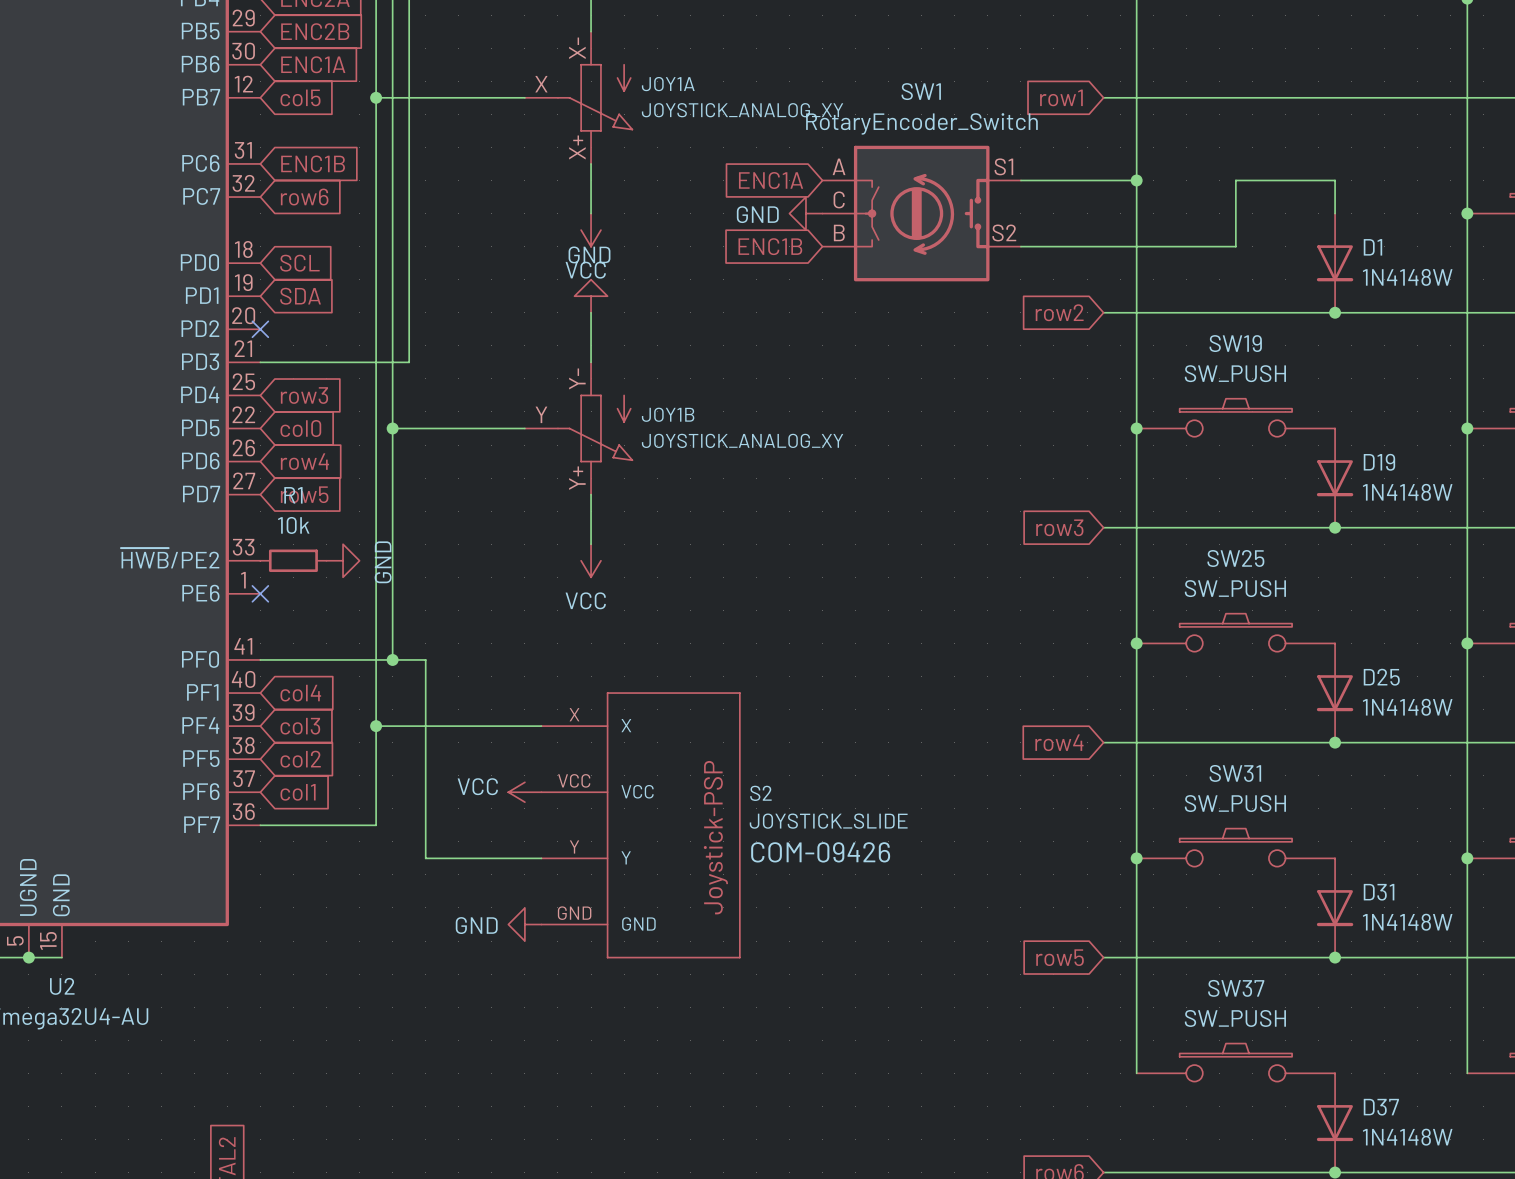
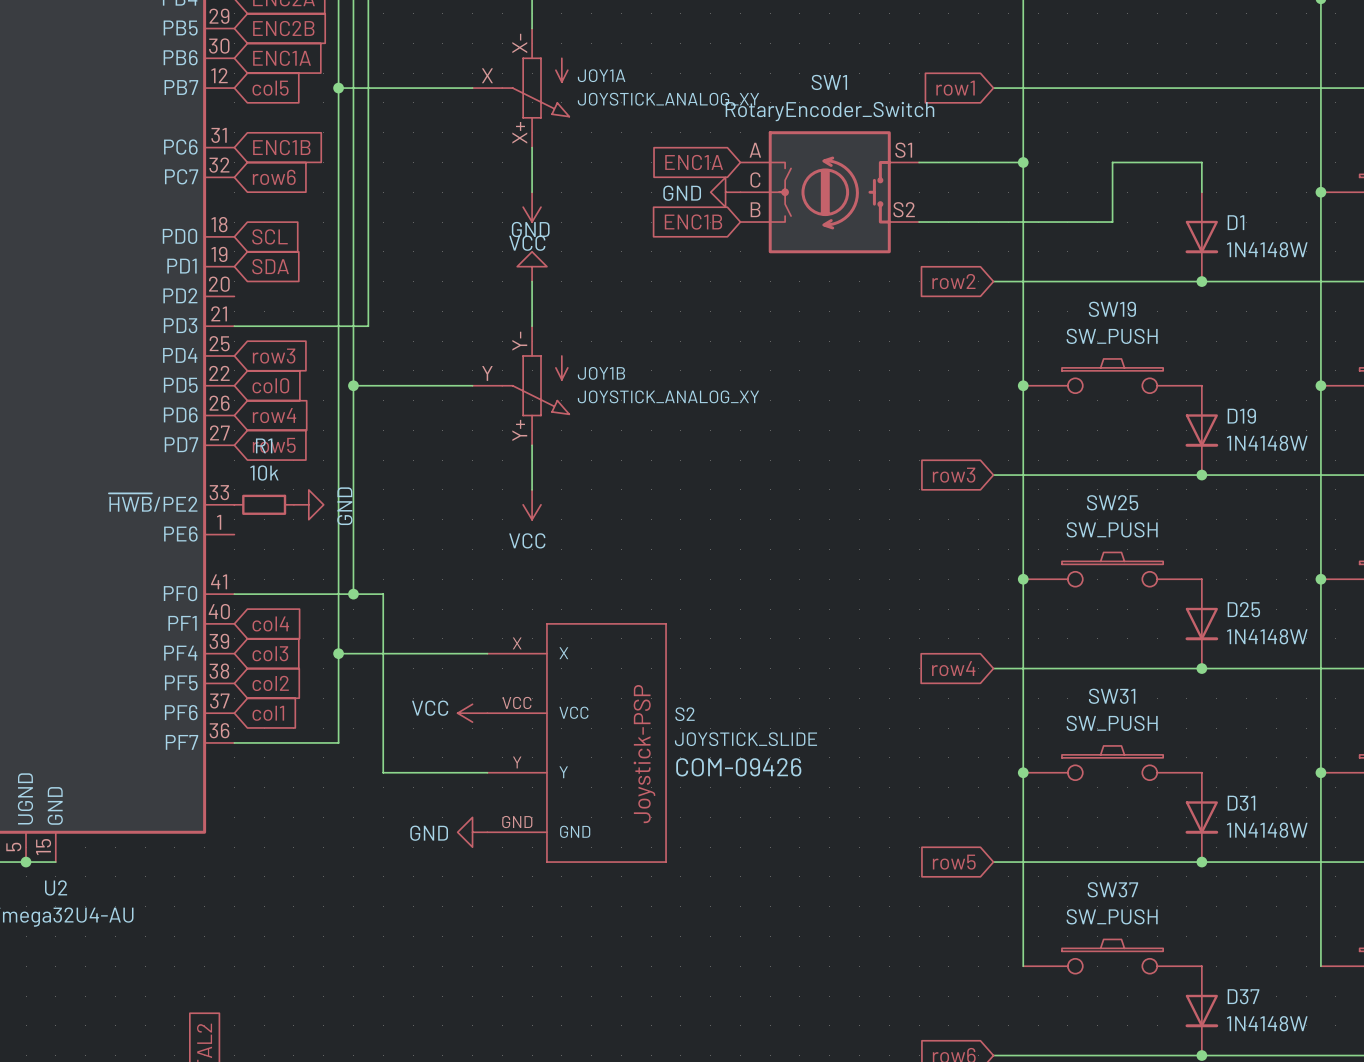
no-connect mark: (260, 329) -> none
no-connect mark: (260, 593) -> none

